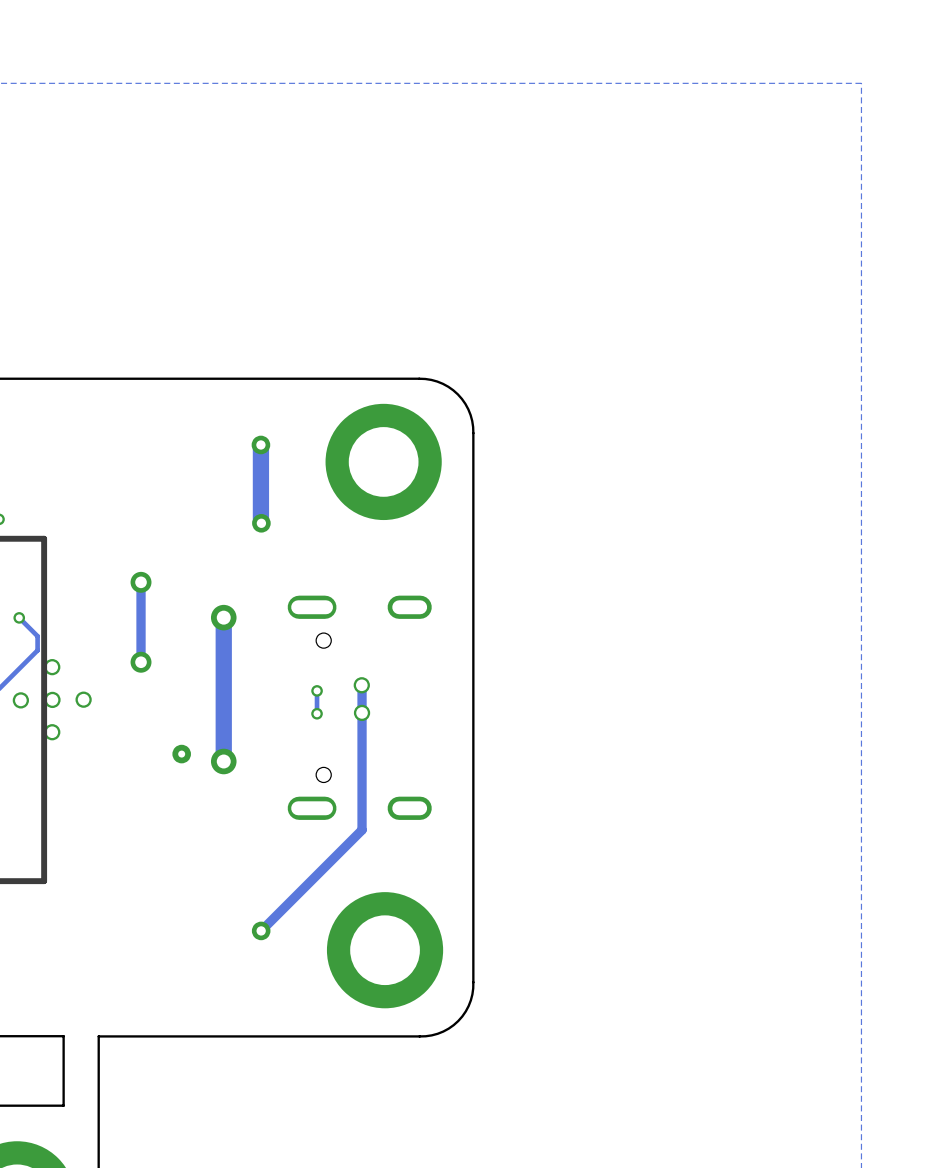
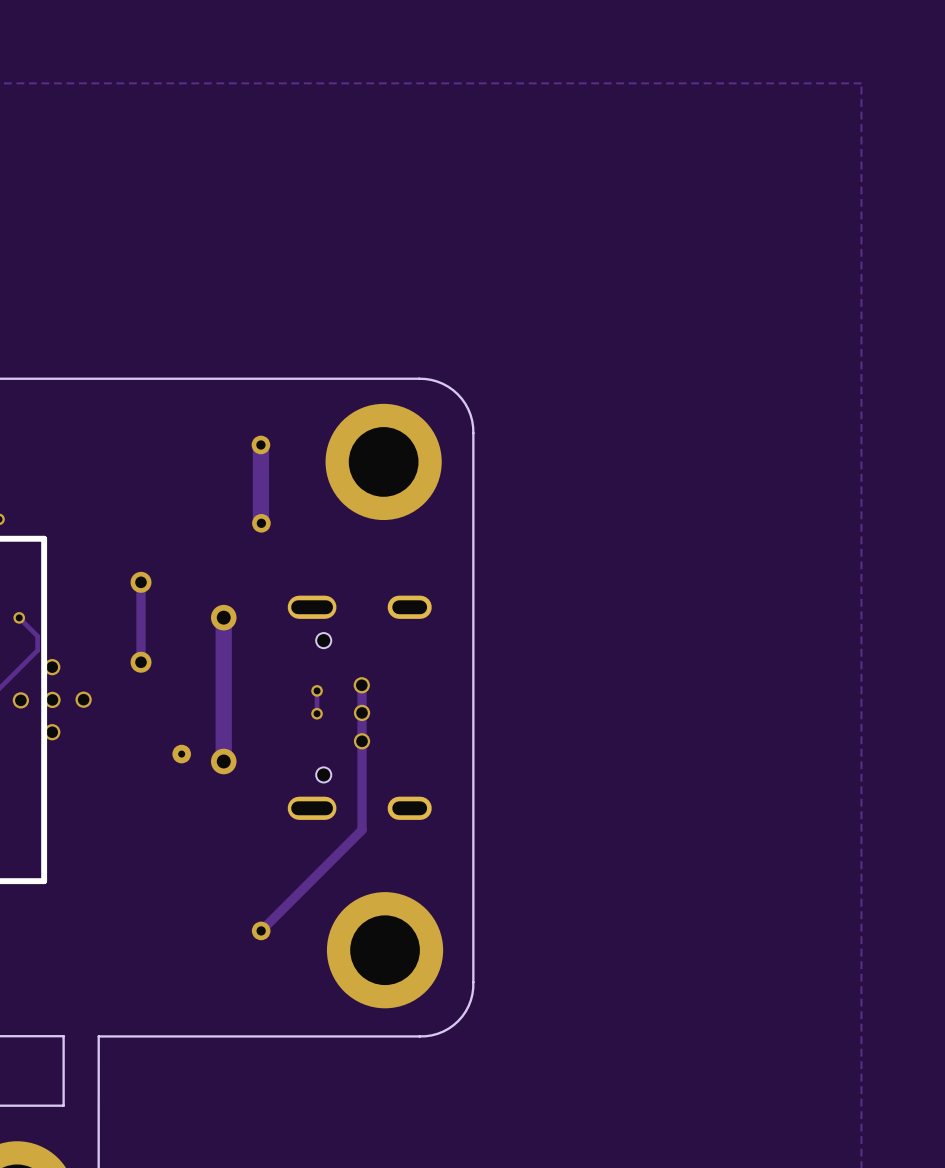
via: none -> (362, 741)

